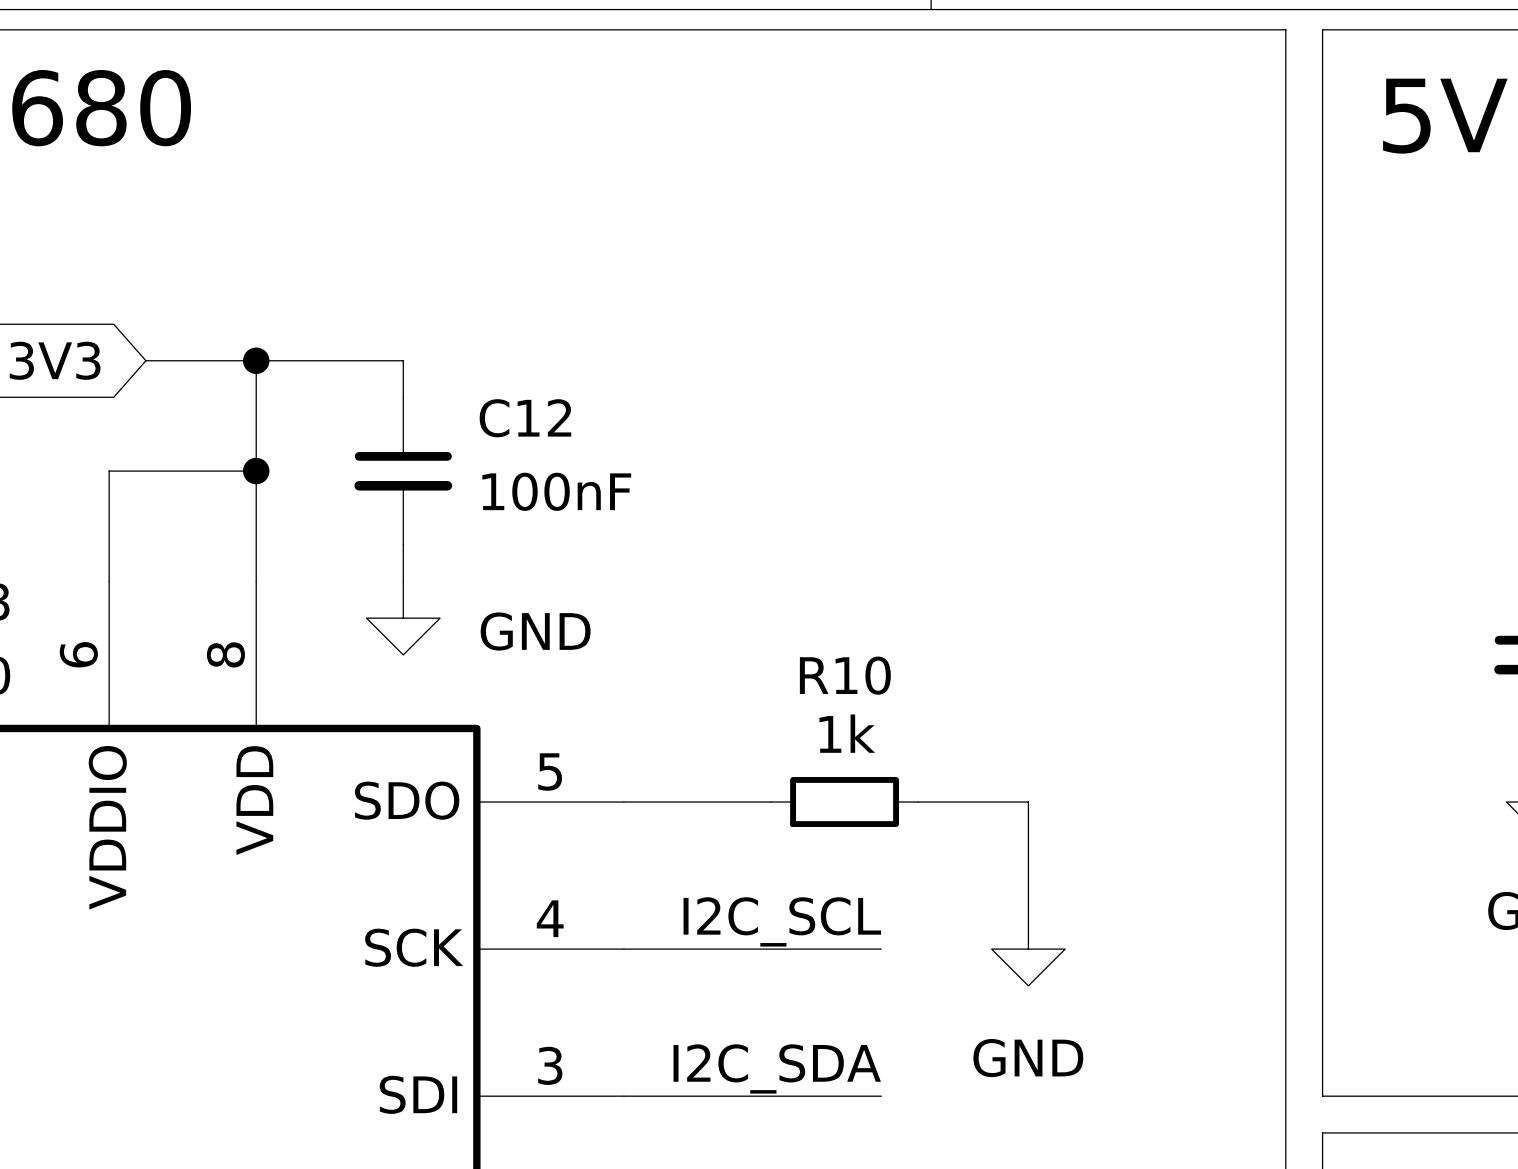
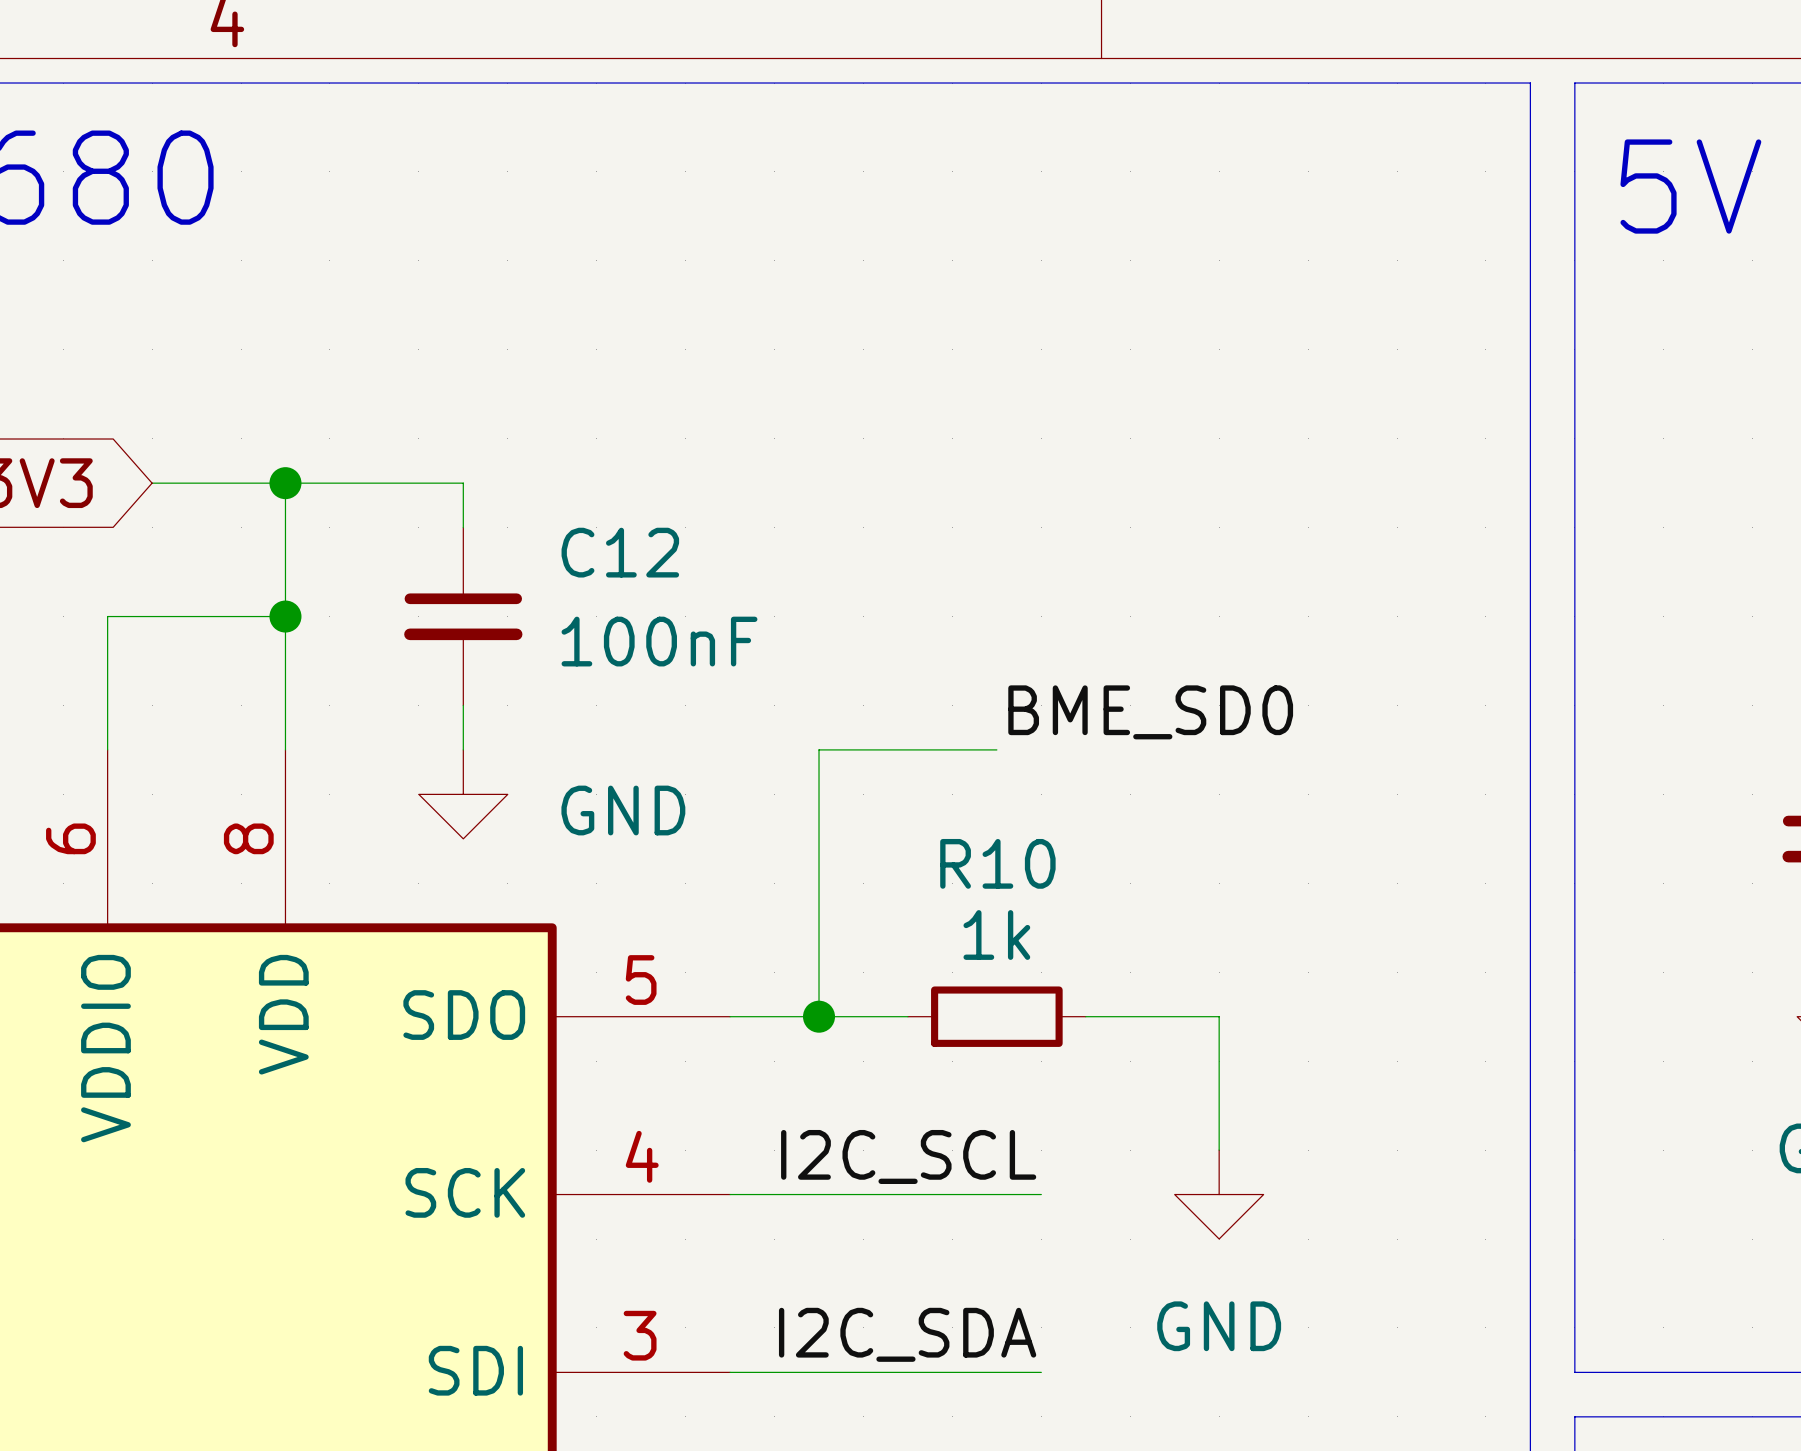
label: none -> BME_SD0 (1150, 712)
wire: none -> (996, 749) (819, 749) (819, 1016)
junction: none -> (819, 1016)

